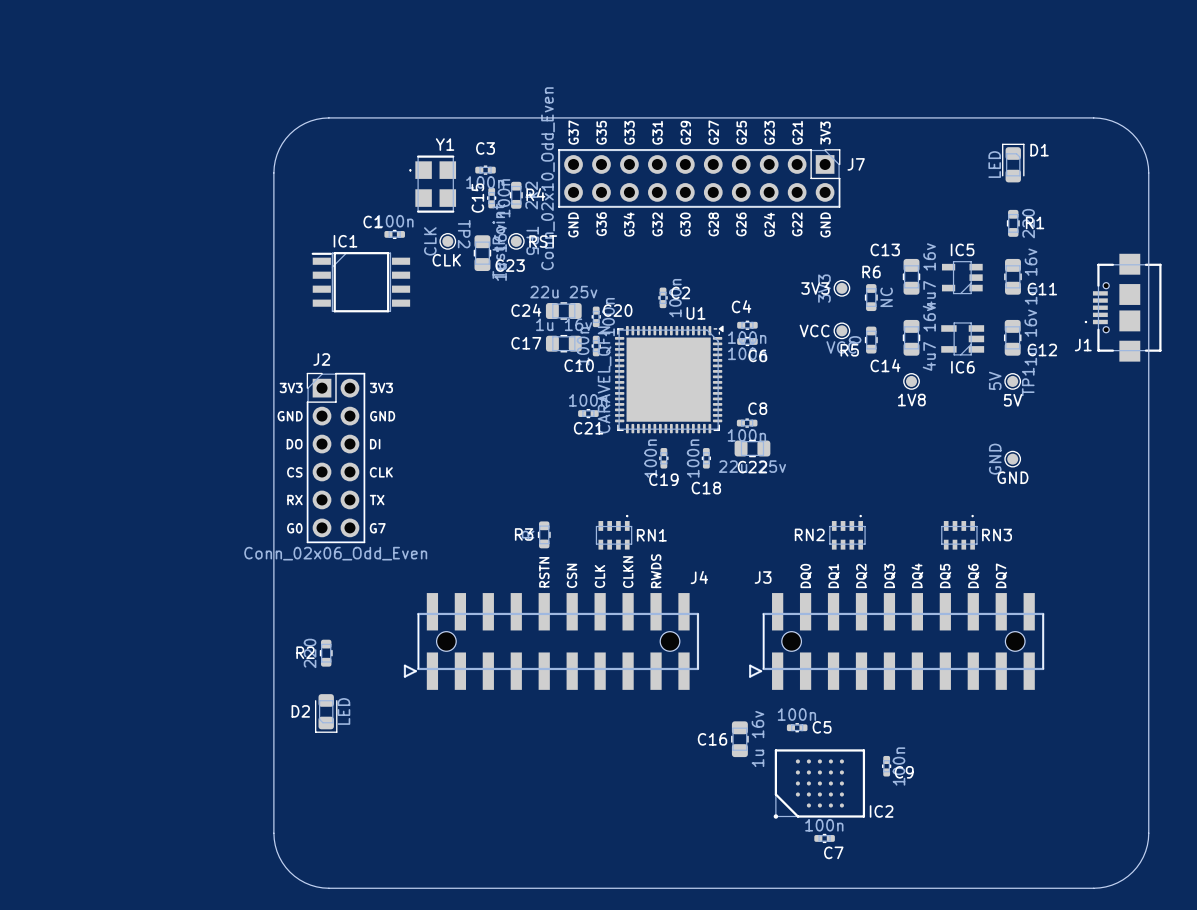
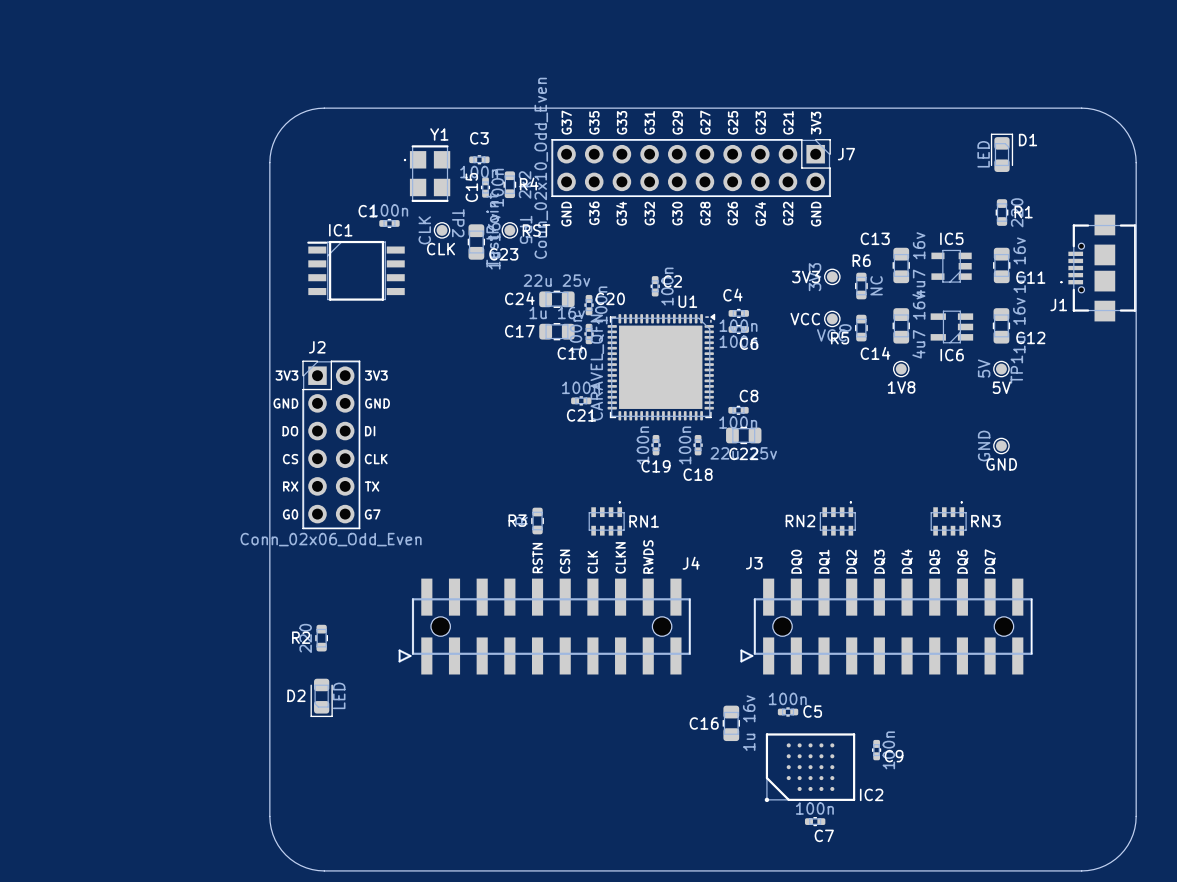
J1 position: (1123, 307) -> (1098, 268)

